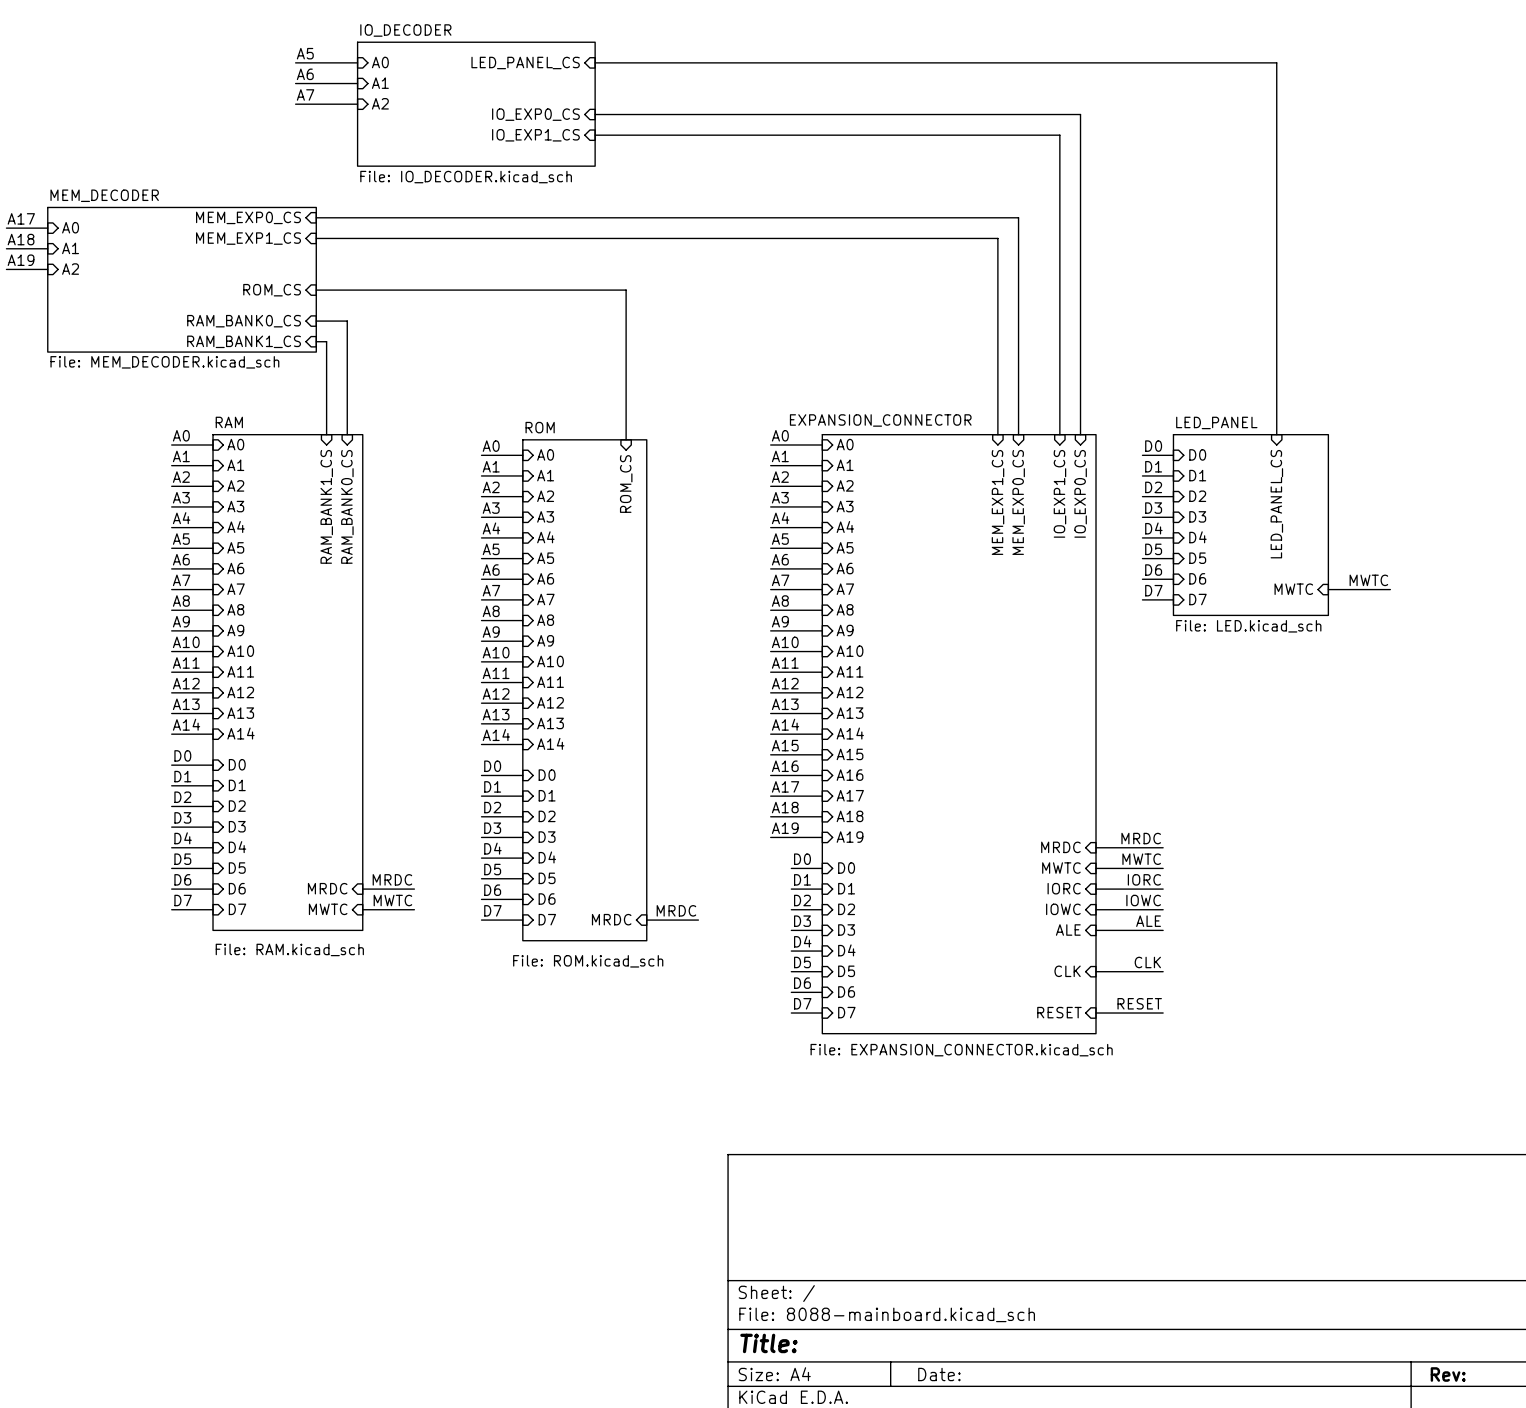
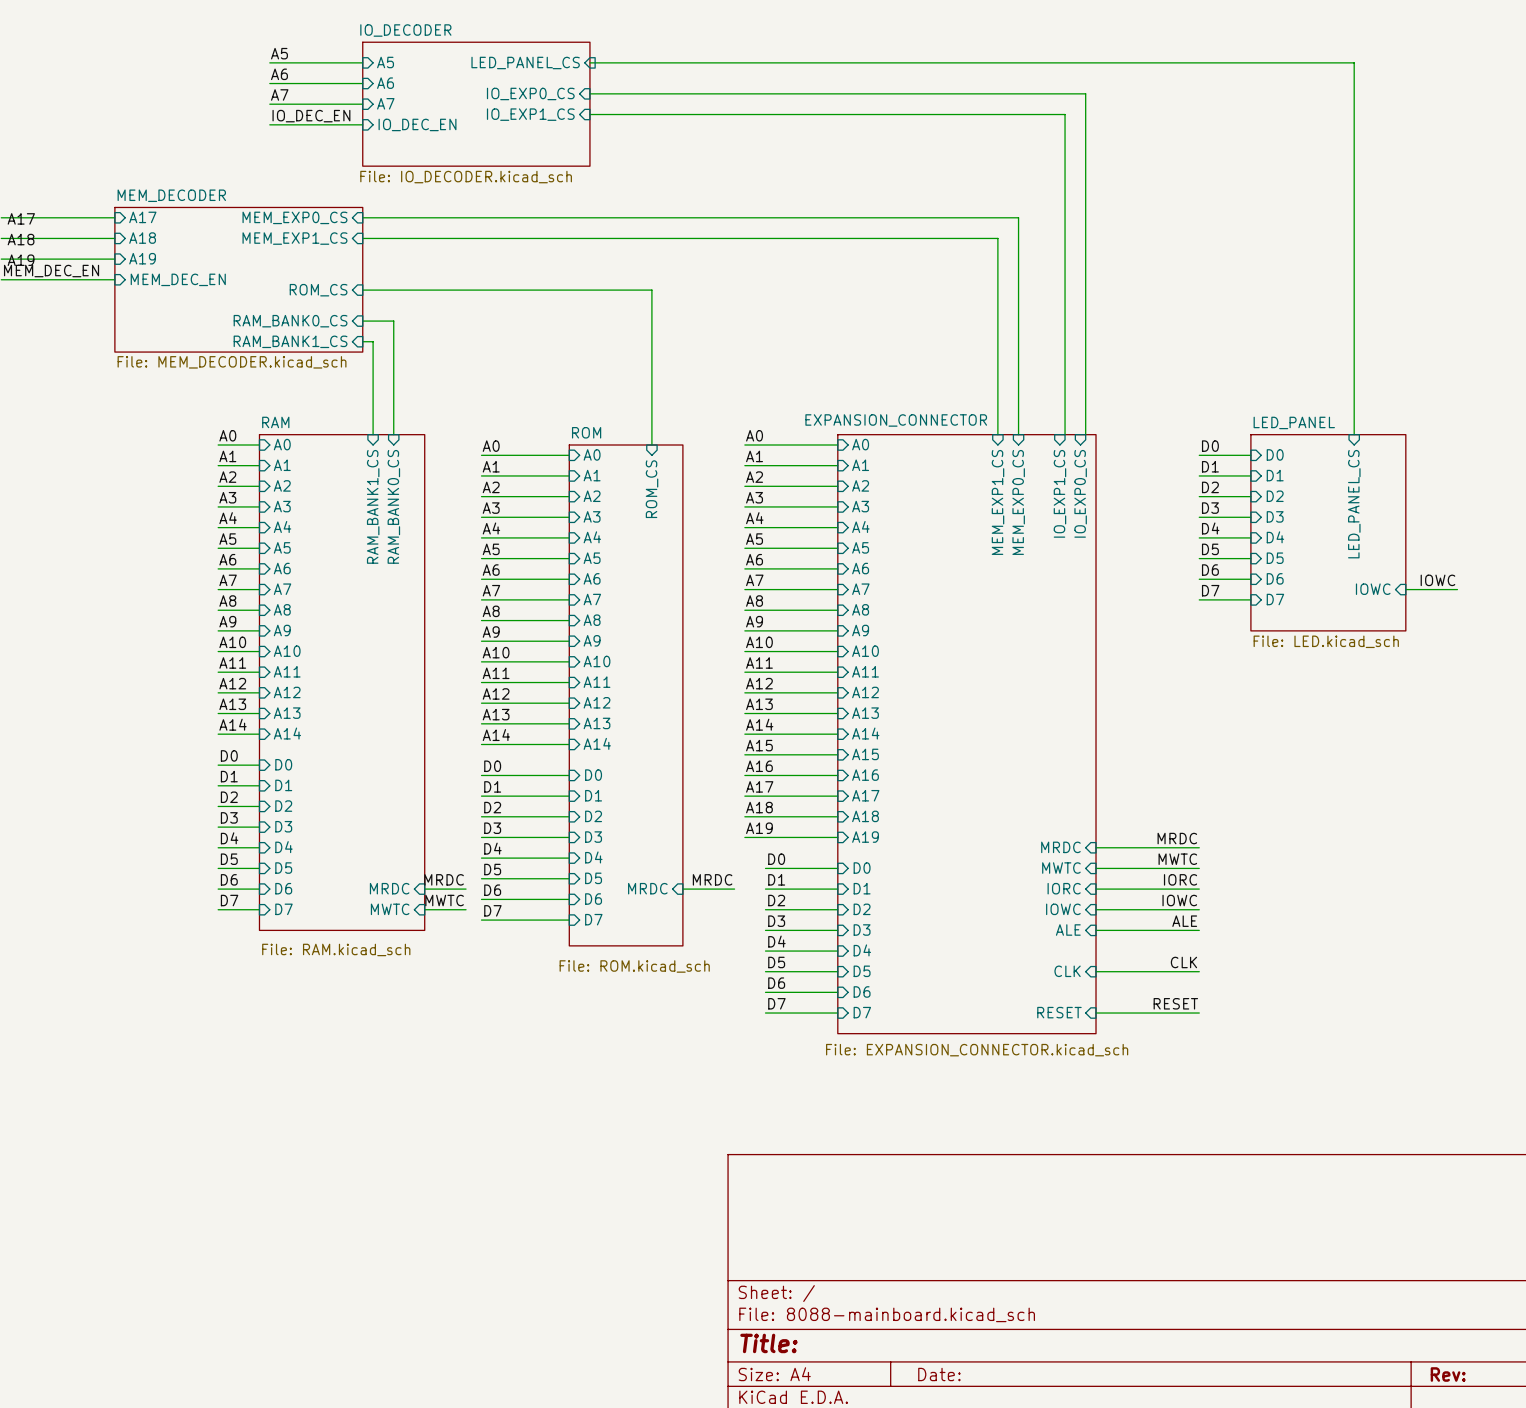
sheet IO_DECODER shape: [356, 41, 596, 167] -> [362, 41, 591, 167]
label position: A5 (305, 53) -> A5 (279, 53)
wire: none -> (269, 62) (295, 62)
wire: none -> (357, 62) (362, 62)
sheet pin: A0 (380, 62) -> A5 (385, 62)
wire: none -> (589, 62) (595, 62)
wire: (1276, 62) (1276, 434) -> (1276, 62) (1354, 62) (1354, 434)
label position: A6 (305, 74) -> A6 (279, 74)
wire: none -> (269, 83) (295, 83)
wire: none -> (357, 83) (362, 83)
sheet pin: A1 (380, 83) -> A6 (385, 83)
wire: none -> (589, 93) (1085, 93) (1085, 434)
label position: A7 (305, 94) -> A7 (279, 94)
sheet pin: A2 (380, 103) -> A7 (385, 103)
wire: none -> (269, 104) (295, 104)
wire: none -> (357, 104) (362, 104)
sheet pin position: IO_EXP0_CS (535, 114) -> IO_EXP0_CS (530, 93)
wire: none -> (589, 114) (595, 114)
wire: (1065, 114) (1080, 114) (1080, 434) -> (1065, 114) (1065, 434)
label: none -> IO_DEC_EN (311, 116)
wire: none -> (269, 124) (362, 124)
sheet pin: none -> IO_DEC_EN (417, 124)
sheet pin position: IO_EXP1_CS (535, 135) -> IO_EXP1_CS (530, 114)
wire: (595, 135) (1059, 135) (1059, 434) -> none
wire: none -> (1, 217) (114, 217)
sheet pin: none -> A17 (142, 217)
sheet pin position: MEM_EXP0_CS (248, 217) -> MEM_EXP0_CS (294, 217)
wire: (316, 217) (362, 217) -> none
sheet pin: A0 (70, 227) -> none
wire: (6, 228) (47, 228) -> none
wire: none -> (1, 238) (114, 238)
sheet pin: none -> A18 (142, 238)
sheet pin position: MEM_EXP1_CS (248, 238) -> MEM_EXP1_CS (294, 238)
wire: (316, 238) (362, 238) -> none
wire: (6, 248) (47, 248) -> none
sheet pin: A1 (70, 248) -> none
sheet pin: none -> A19 (142, 258)
wire: none -> (1, 259) (114, 259)
wire: (6, 269) (47, 269) -> none
sheet pin: A2 (70, 269) -> none
label: none -> MEM_DEC_EN (51, 271)
wire: none -> (1, 279) (114, 279)
sheet pin: none -> MEM_DEC_EN (178, 279)
sheet MEM_DECODER: File: MEM_DECODER.kicad_sch (182, 279) -> none
sheet MEM_DECODER: none -> File: MEM_DECODER.kicad_sch (238, 279)
sheet pin position: ROM_CS (272, 290) -> ROM_CS (318, 290)
wire: (316, 290) (362, 290) -> none
wire: (626, 290) (626, 439) -> (626, 290) (651, 290) (651, 445)
sheet pin position: RAM_BANK0_CS (244, 321) -> RAM_BANK0_CS (290, 321)
wire: (316, 321) (347, 321) (347, 434) -> (362, 321) (393, 321) (393, 434)
sheet pin position: RAM_BANK1_CS (244, 341) -> RAM_BANK1_CS (290, 341)
wire: (316, 341) (326, 341) (326, 434) -> (362, 341) (373, 341) (373, 434)
sheet EXPANSION_CONNECTOR shape: [821, 434, 1097, 1035] -> [837, 434, 1097, 1035]
label position: A0 (181, 435) -> A0 (227, 435)
label position: A0 (780, 435) -> A0 (754, 435)
sheet pin position: A0 (235, 444) -> A0 (282, 444)
sheet pin position: A0 (845, 444) -> A0 (860, 444)
wire: (171, 445) (213, 445) -> (218, 445) (259, 445)
wire: none -> (744, 445) (770, 445)
wire: none -> (822, 445) (837, 445)
label position: D0 (1153, 446) -> D0 (1210, 446)
sheet pin position: A0 (545, 454) -> A0 (592, 454)
sheet pin position: D0 (1197, 454) -> D0 (1275, 454)
wire: none -> (522, 455) (569, 455)
wire: (1142, 455) (1173, 455) -> none
wire: none -> (1199, 455) (1250, 455)
label position: A1 (181, 456) -> A1 (227, 456)
label position: A1 (780, 456) -> A1 (754, 456)
wire: (171, 465) (213, 465) -> (218, 465) (259, 465)
sheet pin position: A1 (235, 465) -> A1 (282, 465)
wire: none -> (744, 465) (770, 465)
wire: none -> (822, 465) (837, 465)
sheet pin position: A1 (845, 465) -> A1 (860, 465)
label position: D1 (1153, 466) -> D1 (1210, 466)
wire: none -> (522, 475) (569, 475)
sheet pin position: A1 (545, 475) -> A1 (592, 475)
wire: (1142, 475) (1173, 475) -> none
sheet pin position: D1 (1197, 475) -> D1 (1275, 475)
wire: none -> (1199, 475) (1250, 475)
label position: A2 (181, 477) -> A2 (227, 477)
label position: A2 (780, 477) -> A2 (754, 477)
sheet pin position: ROM_CS (626, 484) -> ROM_CS (652, 489)
sheet pin position: A2 (235, 485) -> A2 (282, 485)
sheet pin position: A2 (845, 485) -> A2 (860, 485)
wire: (171, 486) (213, 486) -> (218, 486) (259, 486)
wire: none -> (744, 486) (770, 486)
wire: none -> (822, 486) (837, 486)
label position: D2 (1153, 487) -> D2 (1210, 487)
wire: none -> (522, 496) (569, 496)
sheet pin position: A2 (545, 496) -> A2 (592, 496)
wire: (1142, 496) (1173, 496) -> none
sheet pin position: D2 (1197, 496) -> D2 (1275, 496)
wire: none -> (1199, 496) (1250, 496)
label position: A3 (181, 497) -> A3 (227, 497)
label position: A3 (780, 497) -> A3 (754, 497)
sheet pin position: LED_PANEL_CS (1276, 504) -> LED_PANEL_CS (1354, 504)
wire: (171, 506) (213, 506) -> (218, 506) (259, 506)
sheet pin position: A3 (235, 506) -> A3 (282, 506)
sheet pin position: RAM_BANK1_CS (326, 506) -> RAM_BANK1_CS (373, 506)
sheet pin position: RAM_BANK0_CS (347, 506) -> RAM_BANK0_CS (393, 506)
wire: none -> (744, 506) (770, 506)
wire: none -> (822, 506) (837, 506)
sheet pin position: A3 (845, 506) -> A3 (860, 506)
label position: D3 (1153, 508) -> D3 (1210, 508)
sheet pin position: A3 (545, 516) -> A3 (592, 516)
sheet pin position: D3 (1197, 516) -> D3 (1275, 516)
wire: none -> (522, 517) (569, 517)
wire: (1142, 517) (1173, 517) -> none
wire: none -> (1199, 517) (1250, 517)
label position: A4 (181, 518) -> A4 (228, 518)
label position: A4 (780, 518) -> A4 (754, 518)
sheet LED_PANEL: File: LED.kicad_sch (1250, 525) -> none
sheet pin position: A4 (236, 526) -> A4 (282, 526)
sheet pin position: A4 (845, 526) -> A4 (860, 526)
wire: (171, 527) (213, 527) -> (218, 527) (259, 527)
wire: none -> (744, 527) (770, 527)
wire: none -> (822, 527) (837, 527)
label position: D4 (1153, 528) -> D4 (1210, 528)
sheet LED_PANEL: none -> File: LED.kicad_sch (1328, 532)
wire: none -> (522, 537) (569, 537)
sheet pin position: A4 (545, 537) -> A4 (592, 537)
wire: (1142, 537) (1173, 537) -> none
sheet pin position: D4 (1197, 537) -> D4 (1275, 537)
wire: none -> (1199, 537) (1250, 537)
label position: A5 (181, 539) -> A5 (227, 539)
label position: A5 (780, 539) -> A5 (754, 539)
sheet pin position: A5 (235, 547) -> A5 (282, 547)
sheet pin position: A5 (845, 547) -> A5 (860, 547)
wire: (171, 548) (213, 548) -> (218, 548) (259, 548)
wire: none -> (744, 548) (770, 548)
wire: none -> (822, 548) (837, 548)
label position: D5 (1153, 549) -> D5 (1210, 549)
wire: none -> (522, 558) (569, 558)
sheet pin position: A5 (545, 558) -> A5 (592, 558)
wire: (1142, 558) (1173, 558) -> none
sheet pin position: D5 (1197, 558) -> D5 (1275, 558)
wire: none -> (1199, 558) (1250, 558)
label position: A6 (181, 559) -> A6 (227, 559)
label position: A6 (780, 559) -> A6 (754, 559)
wire: (171, 568) (213, 568) -> (218, 568) (259, 568)
sheet pin position: A6 (235, 568) -> A6 (282, 568)
wire: none -> (744, 568) (770, 568)
wire: none -> (822, 568) (837, 568)
sheet pin position: A6 (845, 568) -> A6 (860, 568)
label position: D6 (1153, 570) -> D6 (1210, 570)
sheet pin position: A6 (545, 578) -> A6 (592, 578)
sheet pin position: D6 (1197, 578) -> D6 (1275, 578)
wire: none -> (522, 579) (569, 579)
wire: (1142, 579) (1173, 579) -> none
wire: none -> (1199, 579) (1250, 579)
label position: A7 (181, 580) -> A7 (228, 580)
label position: A7 (780, 580) -> A7 (754, 580)
label: MWTC (1368, 580) -> none
label: none -> IOWC (1437, 580)
wire: (171, 589) (213, 589) -> (218, 589) (259, 589)
sheet pin position: A7 (236, 589) -> A7 (282, 589)
wire: none -> (744, 589) (770, 589)
wire: none -> (822, 589) (837, 589)
sheet pin position: A7 (845, 589) -> A7 (860, 589)
sheet pin: MWTC (1293, 589) -> none
wire: (1328, 589) (1390, 589) -> none
sheet pin: none -> IOWC (1373, 589)
wire: none -> (1405, 589) (1457, 589)
label position: D7 (1153, 590) -> D7 (1210, 590)
wire: none -> (522, 599) (569, 599)
sheet pin position: A7 (545, 599) -> A7 (592, 599)
wire: (1142, 599) (1173, 599) -> none
sheet pin position: D7 (1197, 599) -> D7 (1275, 599)
wire: none -> (1199, 599) (1250, 599)
label position: A8 (181, 601) -> A8 (227, 601)
label position: A8 (780, 601) -> A8 (754, 601)
sheet pin position: A8 (235, 609) -> A8 (282, 609)
sheet pin position: A8 (845, 609) -> A8 (860, 609)
wire: (171, 610) (213, 610) -> (218, 610) (259, 610)
wire: none -> (744, 610) (770, 610)
wire: none -> (822, 610) (837, 610)
wire: none -> (522, 620) (569, 620)
sheet pin position: A8 (545, 620) -> A8 (592, 620)
label position: A9 (181, 621) -> A9 (227, 621)
label position: A9 (780, 621) -> A9 (754, 621)
wire: (171, 630) (213, 630) -> (218, 630) (259, 630)
sheet pin position: A9 (235, 630) -> A9 (282, 630)
wire: none -> (744, 630) (770, 630)
wire: none -> (822, 630) (837, 630)
sheet pin position: A9 (845, 630) -> A9 (860, 630)
sheet pin position: A9 (545, 640) -> A9 (592, 640)
wire: none -> (522, 641) (569, 641)
label position: A10 (186, 642) -> A10 (232, 642)
label position: A10 (785, 642) -> A10 (759, 642)
wire: (171, 651) (213, 651) -> (218, 651) (259, 651)
sheet pin position: A10 (240, 651) -> A10 (287, 651)
wire: none -> (744, 651) (770, 651)
wire: none -> (822, 651) (837, 651)
sheet pin position: A10 (850, 651) -> A10 (865, 651)
wire: none -> (522, 661) (569, 661)
sheet pin position: A10 (550, 661) -> A10 (597, 661)
label position: A11 (186, 662) -> A11 (232, 662)
label position: A11 (785, 662) -> A11 (759, 662)
sheet pin position: A11 (240, 671) -> A11 (287, 671)
sheet pin position: A11 (850, 671) -> A11 (865, 671)
wire: (171, 672) (213, 672) -> (218, 672) (259, 672)
wire: none -> (744, 672) (770, 672)
wire: none -> (822, 672) (837, 672)
sheet RAM: File: RAM.kicad_sch (287, 682) -> none
sheet RAM: none -> File: RAM.kicad_sch (342, 682)
wire: none -> (522, 682) (569, 682)
sheet pin position: A11 (550, 682) -> A11 (597, 682)
label position: A12 (186, 683) -> A12 (232, 683)
label position: A12 (785, 683) -> A12 (759, 683)
sheet ROM: File: ROM.kicad_sch (584, 690) -> none
wire: (171, 692) (213, 692) -> (218, 692) (259, 692)
sheet pin position: A12 (240, 692) -> A12 (287, 692)
wire: none -> (744, 692) (770, 692)
wire: none -> (822, 692) (837, 692)
sheet pin position: A12 (850, 692) -> A12 (865, 692)
sheet ROM: none -> File: ROM.kicad_sch (626, 695)
sheet pin position: A12 (550, 702) -> A12 (597, 702)
wire: none -> (522, 703) (569, 703)
label position: A13 (186, 704) -> A13 (232, 704)
label position: A13 (785, 704) -> A13 (759, 704)
wire: (171, 713) (213, 713) -> (218, 713) (259, 713)
sheet pin position: A13 (240, 713) -> A13 (287, 713)
wire: none -> (744, 713) (770, 713)
wire: none -> (822, 713) (837, 713)
sheet pin position: A13 (850, 713) -> A13 (865, 713)
wire: none -> (522, 723) (569, 723)
sheet pin position: A13 (550, 723) -> A13 (597, 723)
label position: A14 (186, 724) -> A14 (233, 724)
label position: A14 (785, 724) -> A14 (759, 724)
sheet pin position: A14 (240, 733) -> A14 (287, 733)
sheet pin position: A14 (850, 733) -> A14 (865, 733)
wire: (171, 734) (213, 734) -> (218, 734) (259, 734)
wire: none -> (744, 734) (770, 734)
wire: none -> (822, 734) (837, 734)
sheet pin position: A14 (550, 743) -> A14 (597, 743)
wire: none -> (522, 744) (569, 744)
label position: A15 (785, 745) -> A15 (759, 745)
wire: none -> (744, 754) (770, 754)
wire: none -> (822, 754) (837, 754)
sheet pin position: A15 (850, 754) -> A15 (865, 754)
label position: D0 (182, 755) -> D0 (229, 755)
sheet pin position: D0 (237, 764) -> D0 (283, 764)
wire: (171, 765) (213, 765) -> (218, 765) (259, 765)
label position: A16 (785, 766) -> A16 (759, 766)
wire: none -> (522, 775) (569, 775)
sheet pin position: D0 (547, 775) -> D0 (593, 775)
wire: none -> (744, 775) (770, 775)
wire: none -> (822, 775) (837, 775)
sheet pin position: A16 (850, 775) -> A16 (865, 775)
label position: D1 (182, 776) -> D1 (229, 776)
wire: (171, 785) (213, 785) -> (218, 785) (259, 785)
sheet pin position: D1 (237, 785) -> D1 (283, 785)
label position: A17 (785, 786) -> A17 (759, 786)
sheet pin position: D1 (547, 795) -> D1 (593, 795)
sheet pin position: A17 (850, 795) -> A17 (865, 795)
wire: none -> (522, 796) (569, 796)
wire: none -> (744, 796) (770, 796)
wire: none -> (822, 796) (837, 796)
label position: D2 (182, 797) -> D2 (229, 797)
wire: (171, 806) (213, 806) -> (218, 806) (259, 806)
sheet pin position: D2 (237, 806) -> D2 (283, 806)
label position: A18 (785, 807) -> A18 (759, 807)
wire: none -> (522, 816) (569, 816)
sheet pin position: D2 (547, 816) -> D2 (593, 816)
wire: none -> (744, 816) (770, 816)
wire: none -> (822, 816) (837, 816)
sheet pin position: A18 (850, 816) -> A18 (865, 816)
label position: D3 (182, 817) -> D3 (229, 817)
sheet pin position: D3 (237, 826) -> D3 (283, 826)
wire: (171, 827) (213, 827) -> (218, 827) (259, 827)
label position: A19 (785, 828) -> A19 (759, 828)
wire: none -> (522, 837) (569, 837)
sheet pin position: D3 (547, 837) -> D3 (593, 837)
wire: none -> (744, 837) (770, 837)
wire: none -> (822, 837) (837, 837)
sheet pin position: A19 (850, 837) -> A19 (865, 837)
label position: D4 (183, 838) -> D4 (229, 838)
label position: MRDC (1141, 838) -> MRDC (1177, 838)
wire: (171, 847) (213, 847) -> (218, 847) (259, 847)
sheet pin position: D4 (237, 847) -> D4 (283, 847)
wire: none -> (1163, 847) (1199, 847)
sheet pin position: D4 (547, 857) -> D4 (593, 857)
wire: none -> (522, 858) (569, 858)
label position: D5 (182, 859) -> D5 (229, 859)
label position: D0 (802, 859) -> D0 (776, 859)
label position: MWTC (1141, 859) -> MWTC (1177, 859)
wire: (171, 868) (213, 868) -> (218, 868) (259, 868)
sheet pin position: D5 (237, 868) -> D5 (283, 868)
wire: none -> (765, 868) (791, 868)
wire: none -> (822, 868) (837, 868)
sheet pin position: D0 (846, 868) -> D0 (862, 868)
wire: none -> (1163, 868) (1199, 868)
wire: none -> (522, 878) (569, 878)
sheet pin position: D5 (547, 878) -> D5 (593, 878)
label position: D6 (182, 879) -> D6 (229, 879)
label position: MRDC (392, 879) -> MRDC (444, 879)
label position: D1 (802, 879) -> D1 (776, 879)
label position: IORC (1144, 879) -> IORC (1180, 879)
sheet pin position: D6 (237, 888) -> D6 (283, 888)
sheet pin position: MRDC (327, 888) -> MRDC (389, 888)
sheet pin position: D1 (846, 888) -> D1 (862, 888)
wire: (171, 889) (213, 889) -> (218, 889) (259, 889)
wire: (362, 889) (414, 889) -> none
wire: none -> (424, 889) (466, 889)
wire: none -> (765, 889) (791, 889)
wire: none -> (822, 889) (837, 889)
wire: none -> (1163, 889) (1199, 889)
wire: none -> (522, 899) (569, 899)
sheet pin position: D6 (547, 899) -> D6 (593, 899)
label position: D7 (183, 900) -> D7 (229, 900)
label position: MWTC (392, 900) -> MWTC (444, 900)
label position: D2 (802, 900) -> D2 (776, 900)
label position: IOWC (1143, 900) -> IOWC (1179, 900)
wire: (171, 909) (213, 909) -> (218, 909) (259, 909)
sheet pin position: D7 (237, 909) -> D7 (283, 909)
sheet pin position: MWTC (328, 909) -> MWTC (390, 909)
wire: (362, 909) (414, 909) -> none
wire: none -> (424, 909) (466, 909)
wire: none -> (765, 909) (791, 909)
wire: none -> (822, 909) (837, 909)
sheet pin position: D2 (846, 909) -> D2 (862, 909)
wire: none -> (1163, 909) (1199, 909)
label position: MRDC (676, 910) -> MRDC (712, 879)
sheet pin position: D7 (547, 919) -> D7 (593, 919)
sheet pin position: MRDC (611, 919) -> MRDC (647, 888)
wire: none -> (522, 920) (569, 920)
wire: (646, 920) (698, 920) -> (682, 889) (734, 889)
label position: D3 (802, 921) -> D3 (776, 921)
label position: ALE (1148, 921) -> ALE (1184, 921)
wire: none -> (765, 930) (791, 930)
wire: none -> (822, 930) (837, 930)
sheet pin position: D3 (846, 930) -> D3 (862, 930)
wire: none -> (1163, 930) (1199, 930)
label position: D4 (802, 941) -> D4 (776, 941)
sheet pin position: D4 (846, 950) -> D4 (862, 950)
wire: none -> (765, 951) (791, 951)
wire: none -> (822, 951) (837, 951)
label position: D5 (802, 962) -> D5 (776, 962)
label position: CLK (1147, 962) -> CLK (1183, 962)
wire: none -> (765, 971) (791, 971)
wire: none -> (822, 971) (837, 971)
sheet pin position: D5 (846, 971) -> D5 (862, 971)
wire: none -> (1163, 971) (1199, 971)
label position: D6 (802, 983) -> D6 (776, 983)
sheet pin position: D6 (846, 991) -> D6 (862, 991)
wire: none -> (765, 992) (791, 992)
wire: none -> (822, 992) (837, 992)
label position: D7 (802, 1003) -> D7 (776, 1003)
label position: RESET (1139, 1003) -> RESET (1175, 1003)
sheet pin position: D7 (846, 1012) -> D7 (862, 1012)
wire: none -> (765, 1013) (791, 1013)
wire: none -> (822, 1013) (837, 1013)
wire: none -> (1163, 1013) (1199, 1013)

